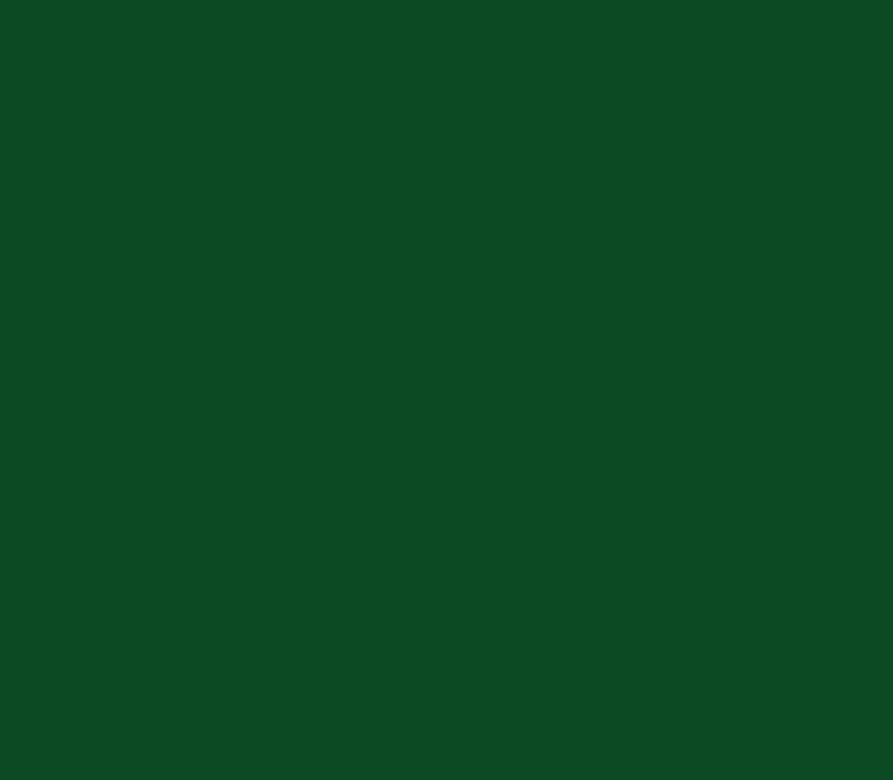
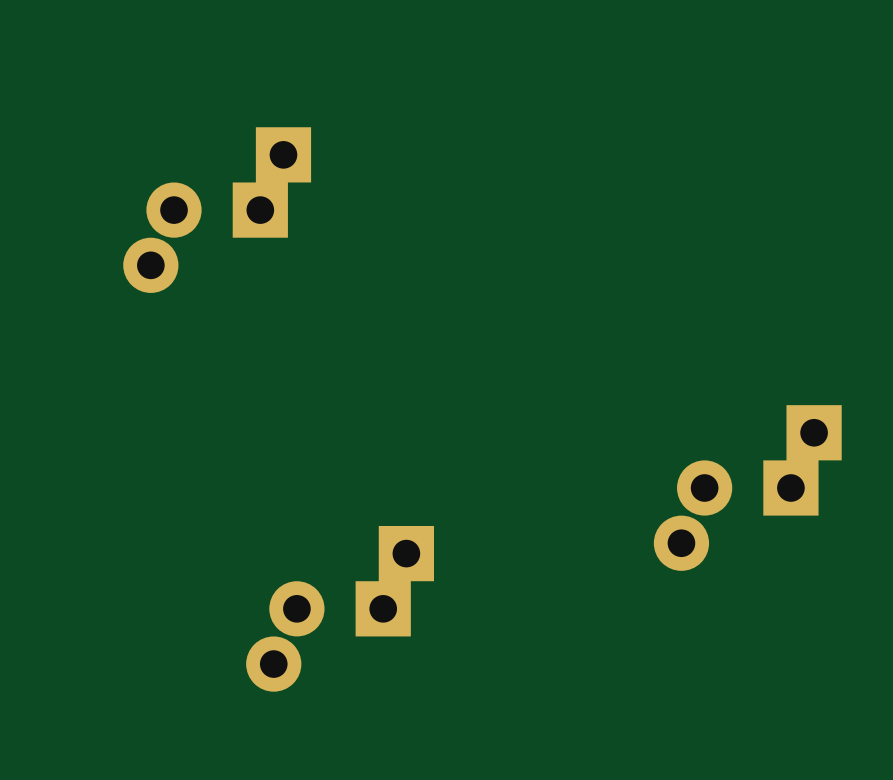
part: none -> (217, 210)
part: none -> (747, 488)
part: none -> (340, 608)

